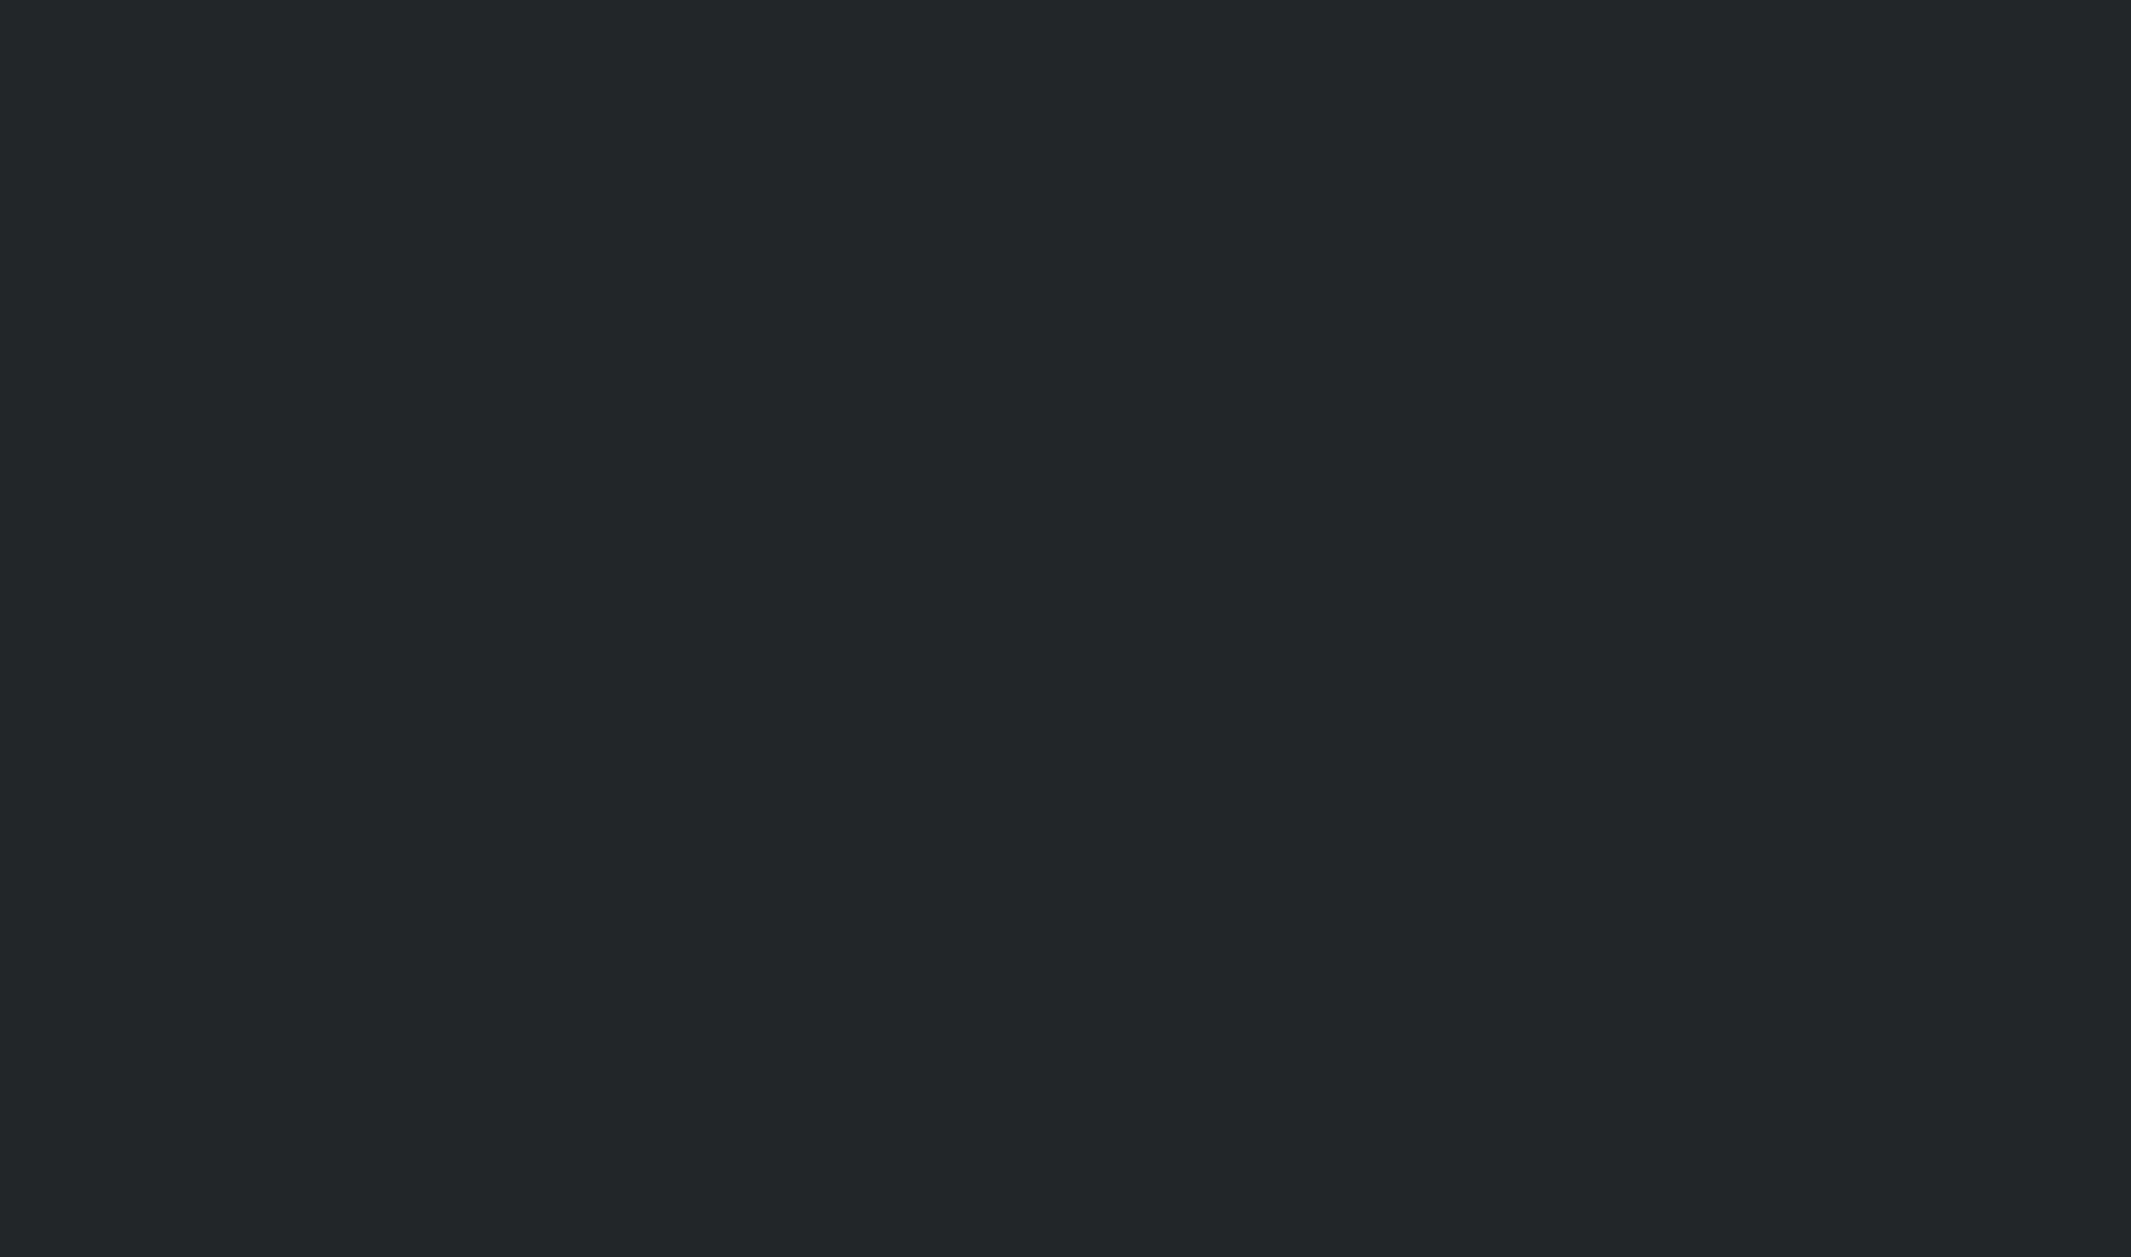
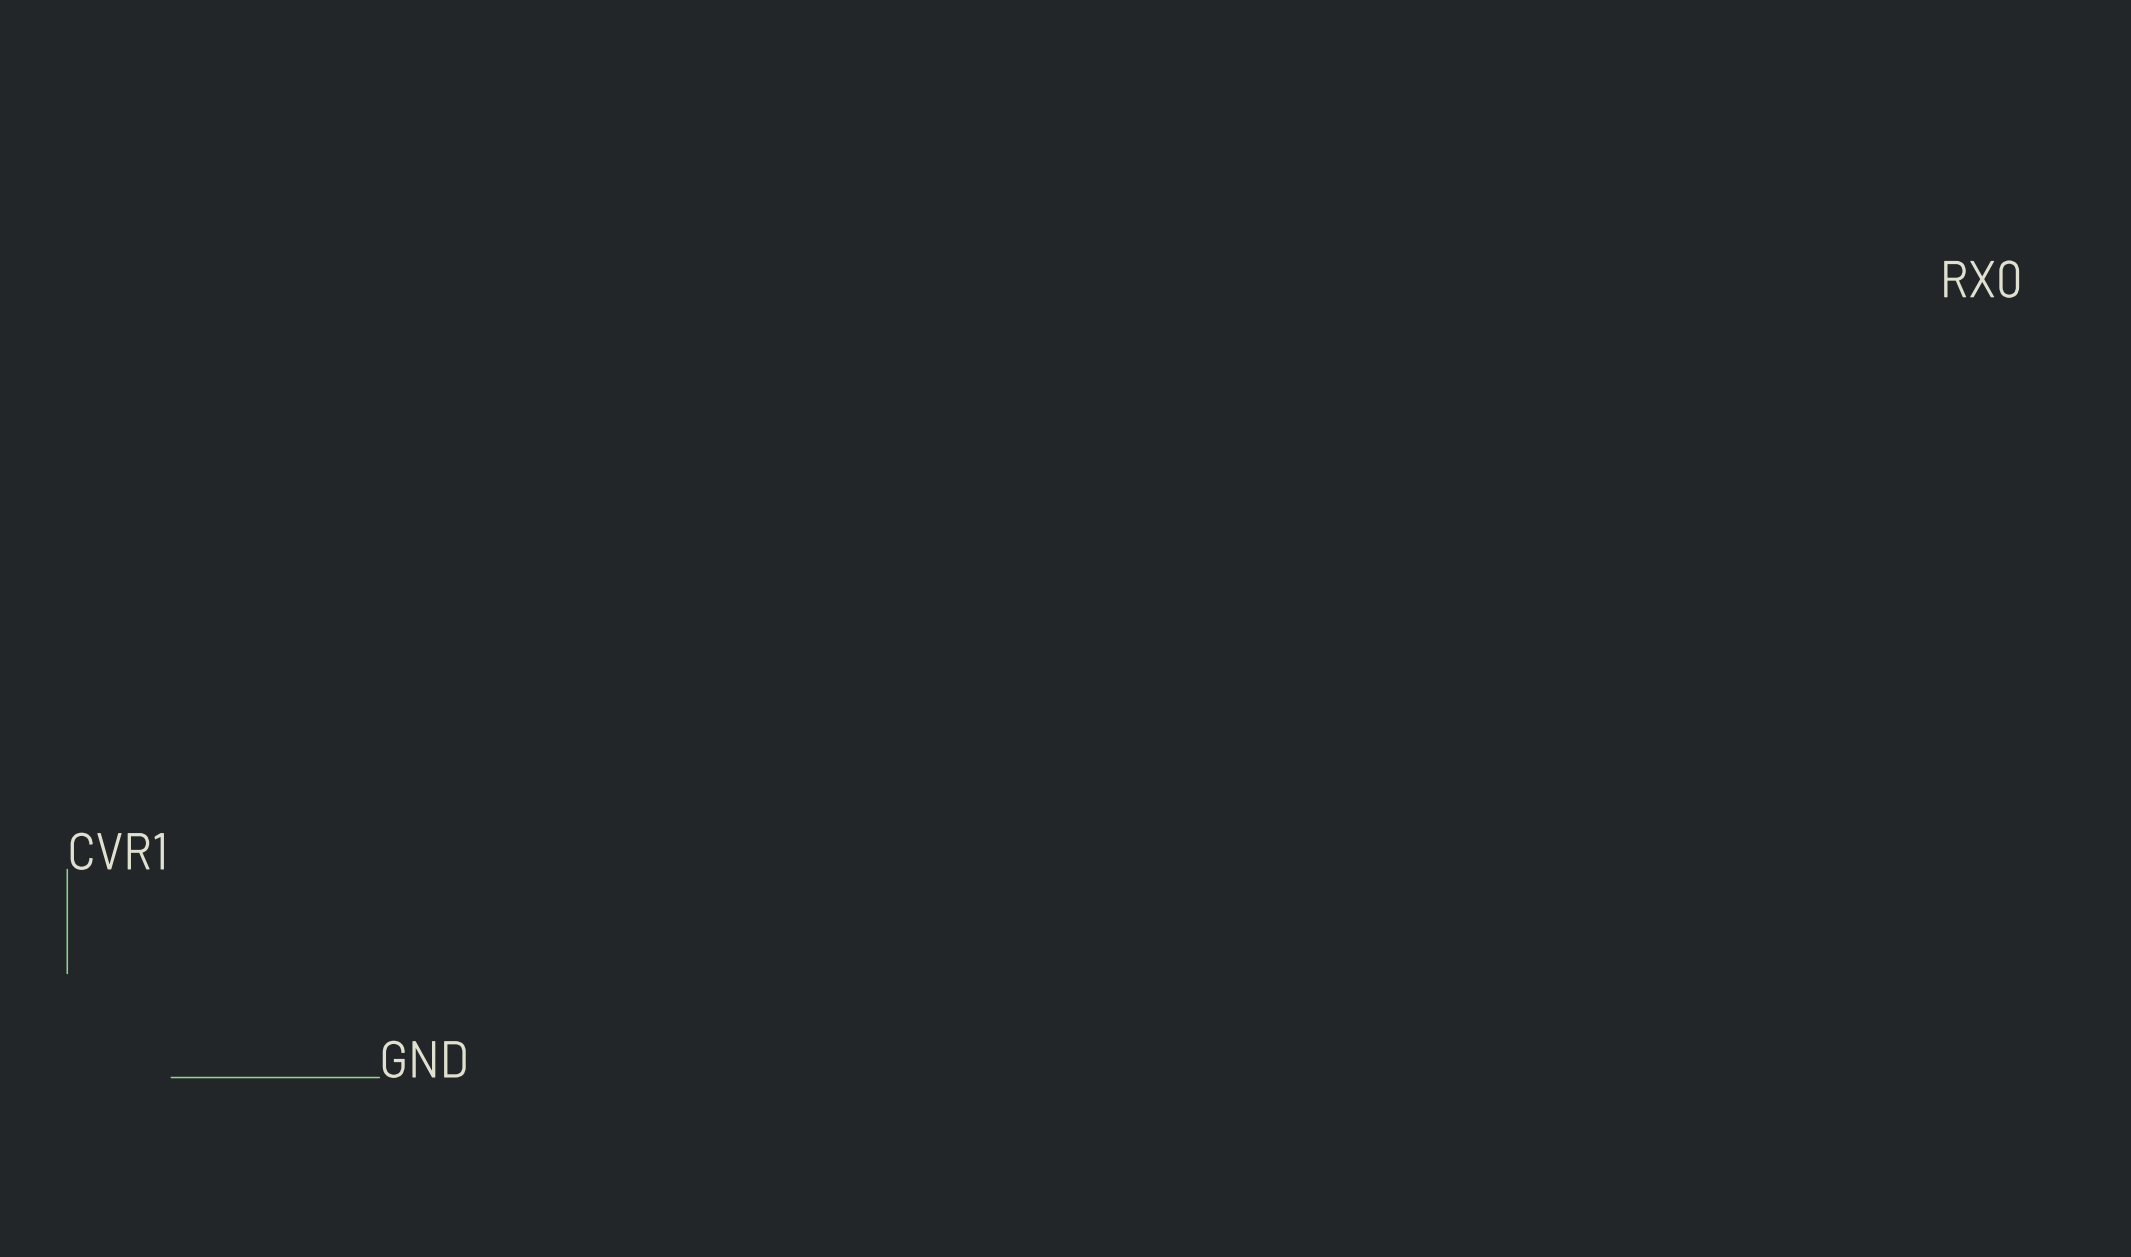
label: none -> RX0 (1981, 279)
label: none -> CVR1 (117, 851)
wire: none -> (67, 869) (67, 973)
label: none -> GND (424, 1059)
wire: none -> (171, 1077) (379, 1077)

